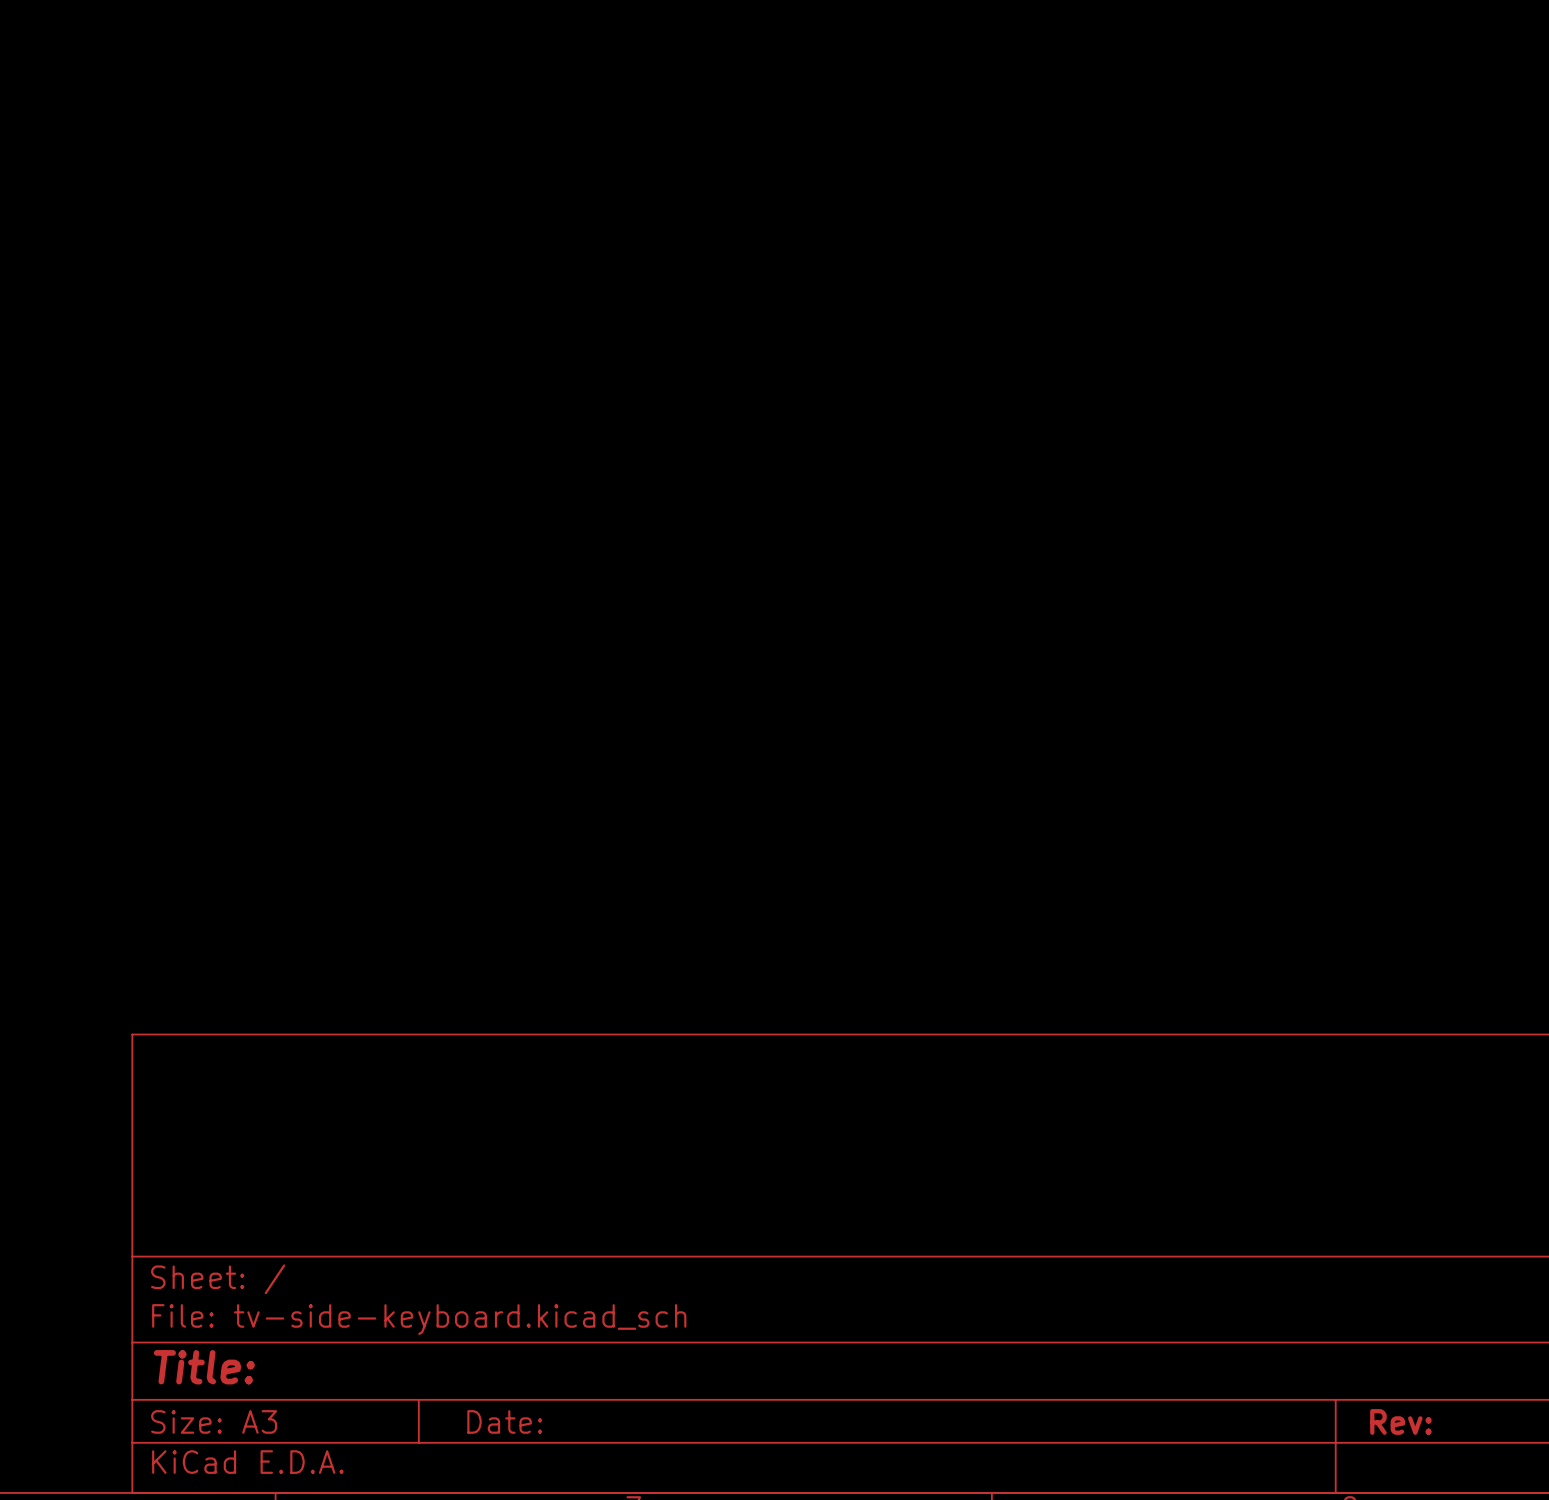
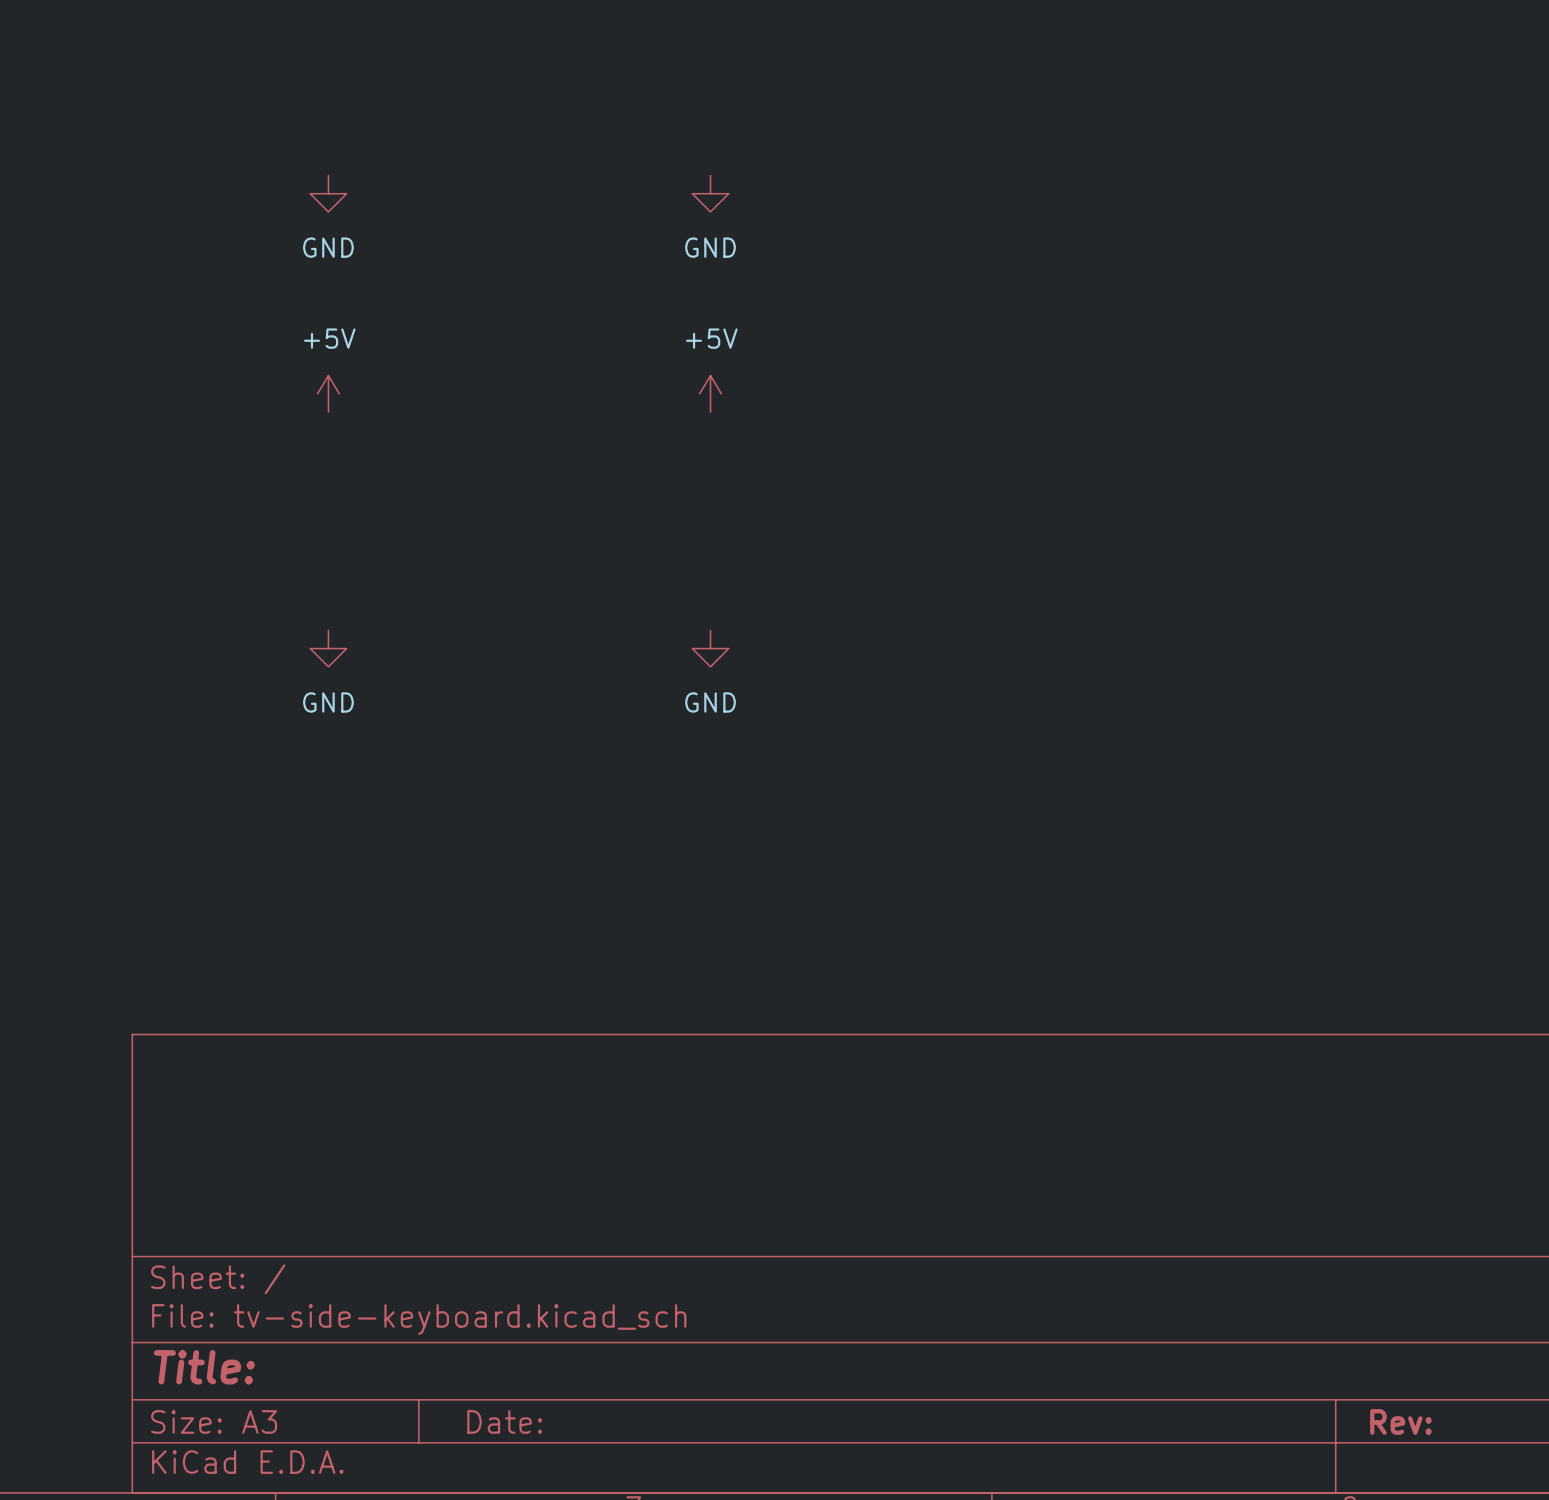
power symbol: none -> GND (328, 193)
power symbol: none -> GND (710, 193)
power symbol: none -> +5V (328, 393)
power symbol: none -> +5V (710, 393)
power symbol: none -> GND (328, 648)
power symbol: none -> GND (710, 648)

